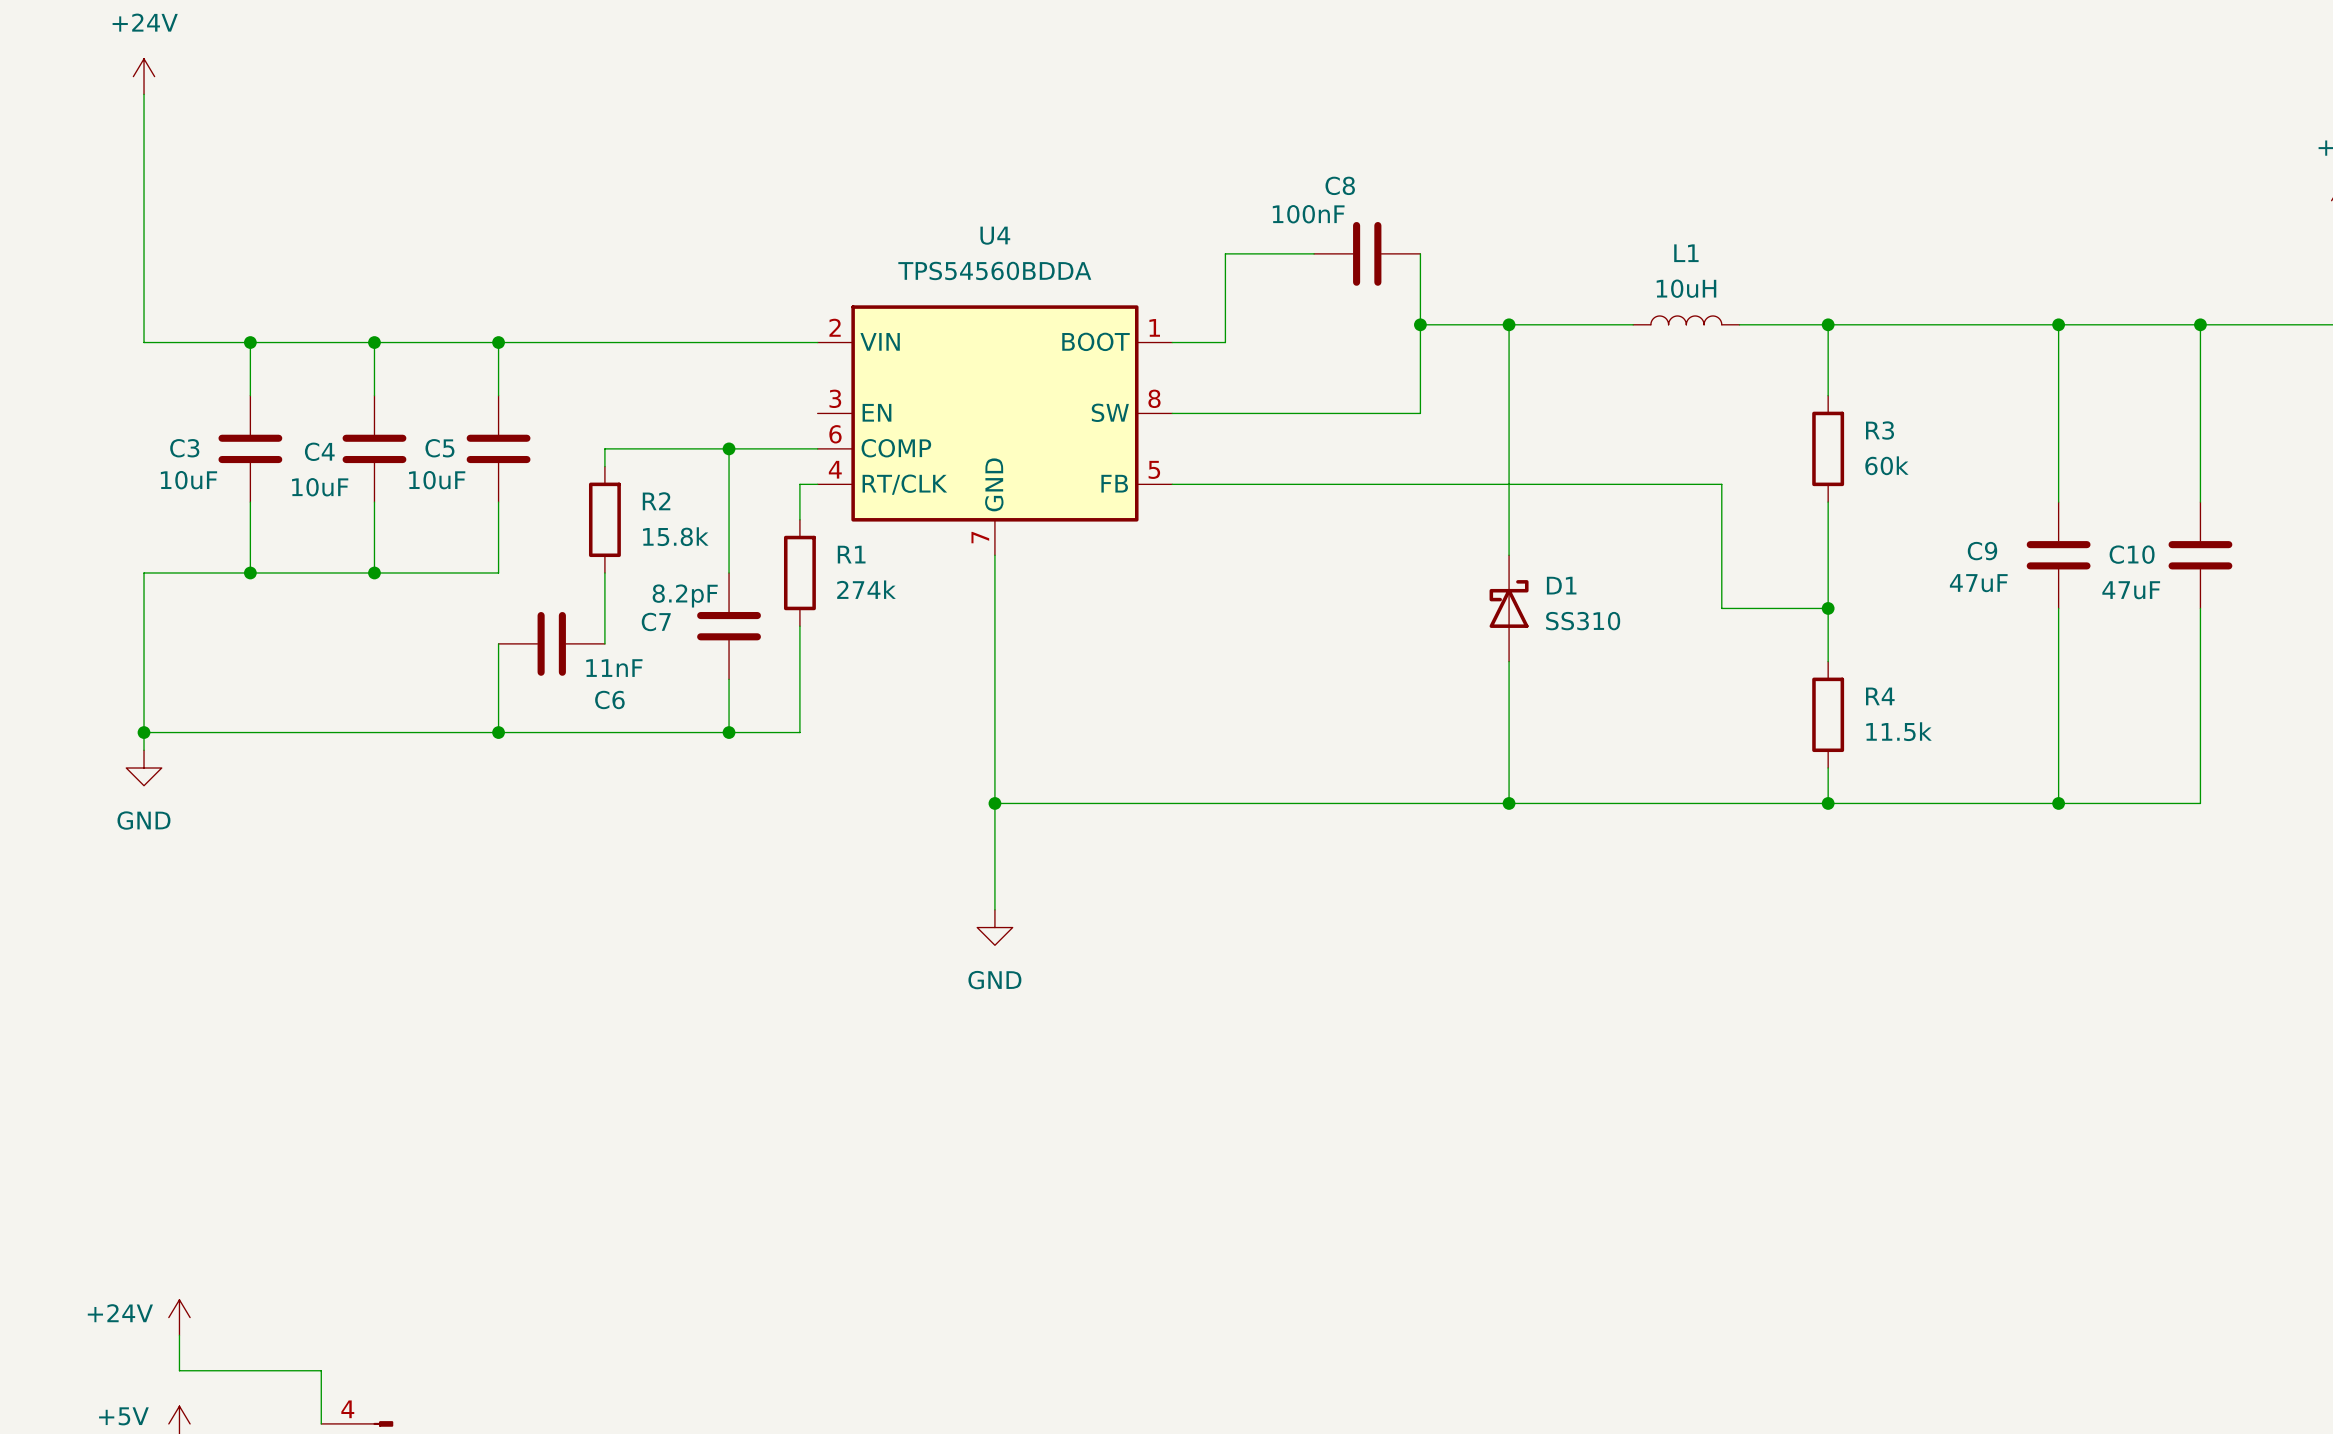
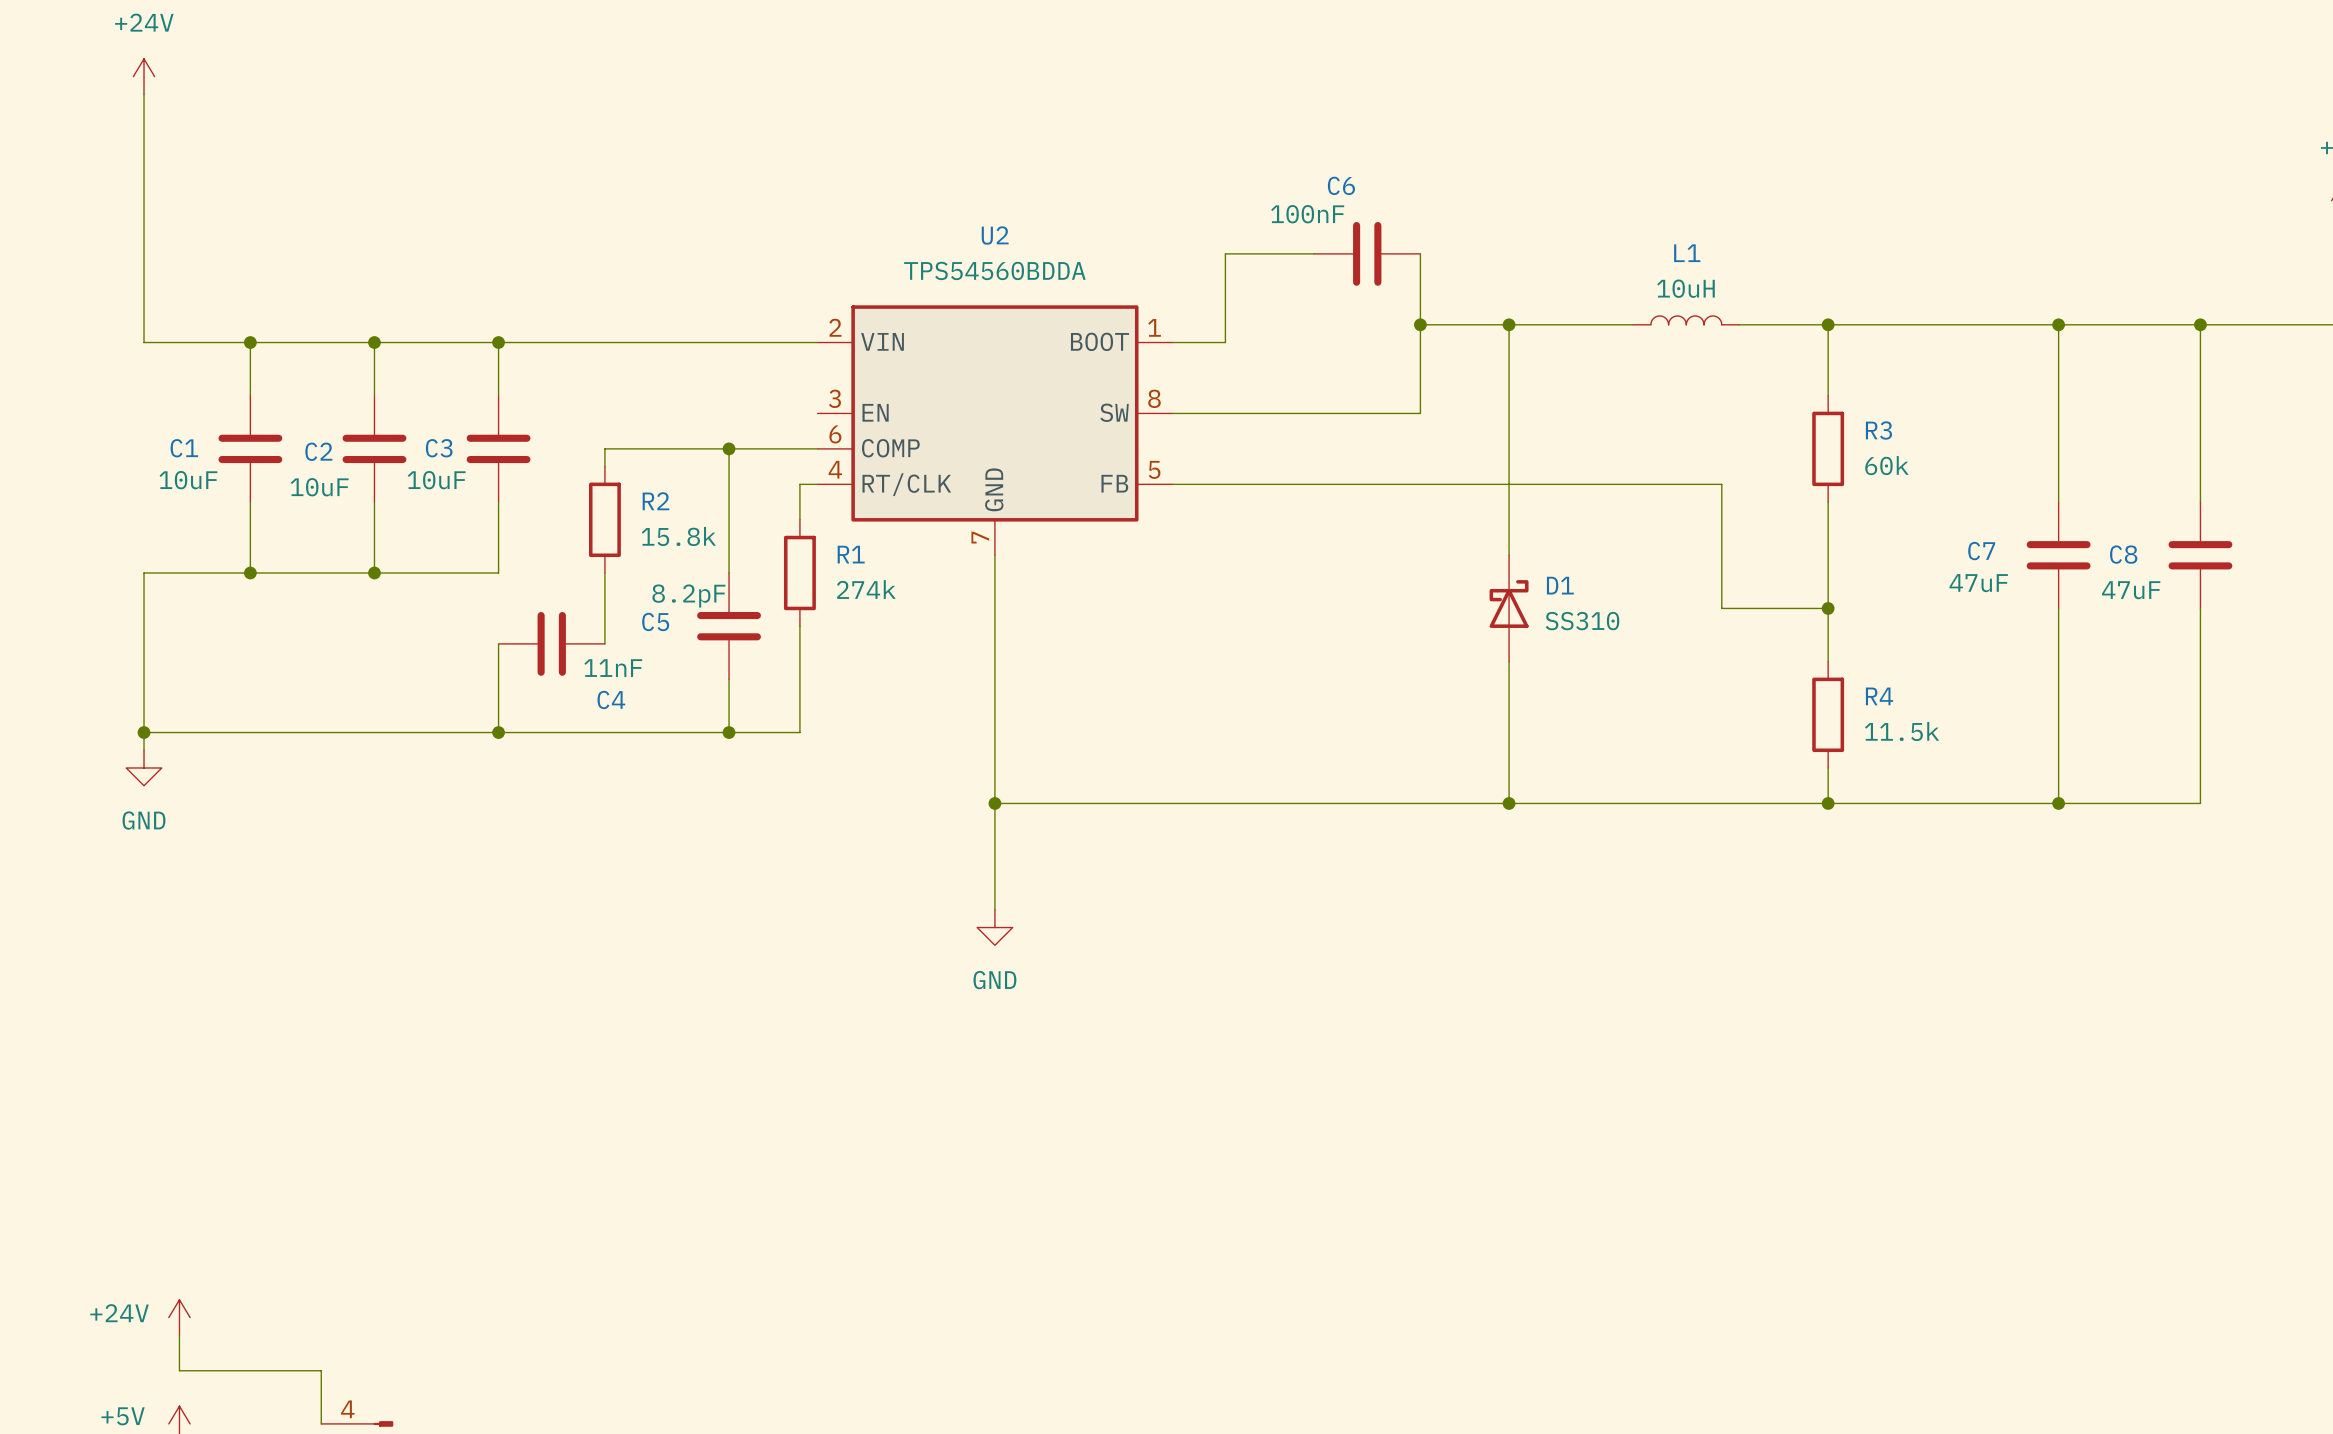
C8 name: C8 (1340, 185) -> C6 (1341, 185)
U4 name: U4 (995, 235) -> U2 (995, 235)
C3 name: C3 (184, 448) -> C1 (184, 448)
C5 name: C5 (439, 448) -> C3 (439, 448)
C4 name: C4 (319, 451) -> C2 (318, 451)
C9 name: C9 (1982, 551) -> C7 (1981, 551)
C10 name: C10 (2132, 554) -> C8 (2123, 554)
C7 name: C7 (656, 621) -> C5 (655, 621)
C6 name: C6 (609, 699) -> C4 (611, 699)

